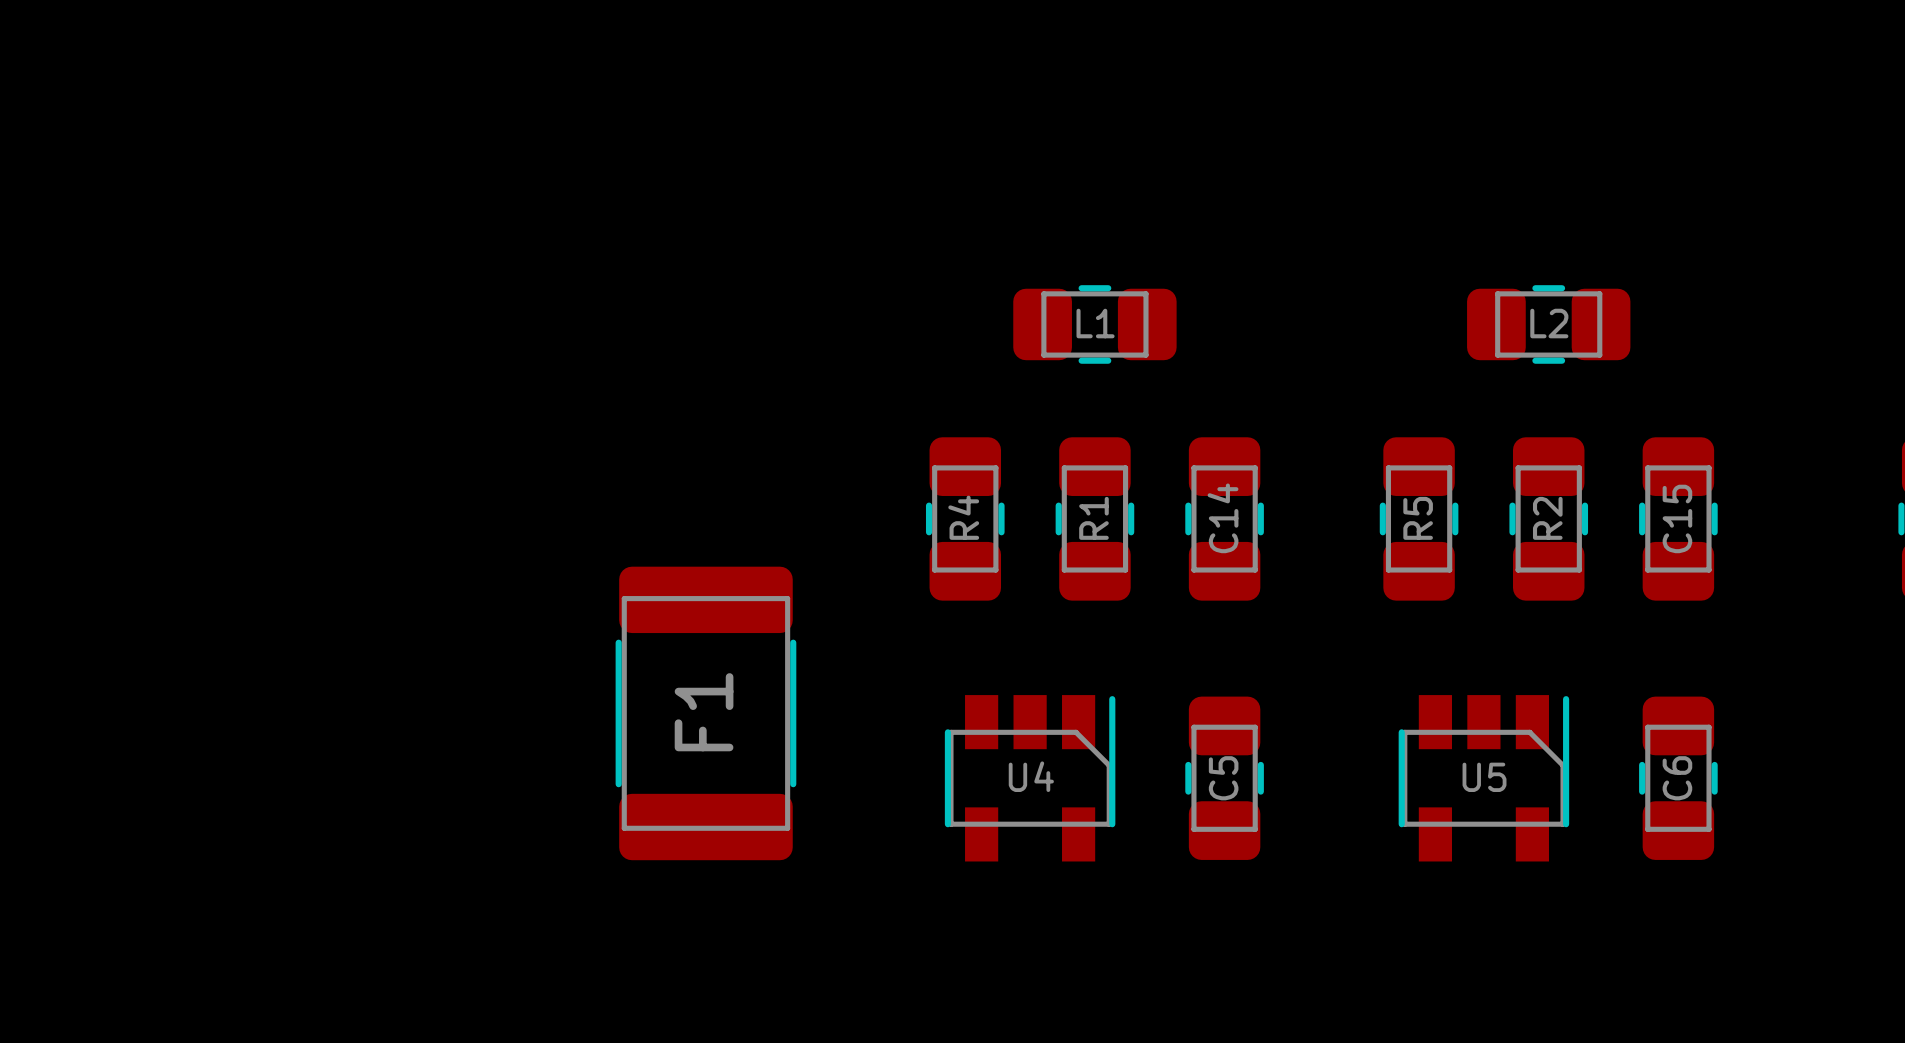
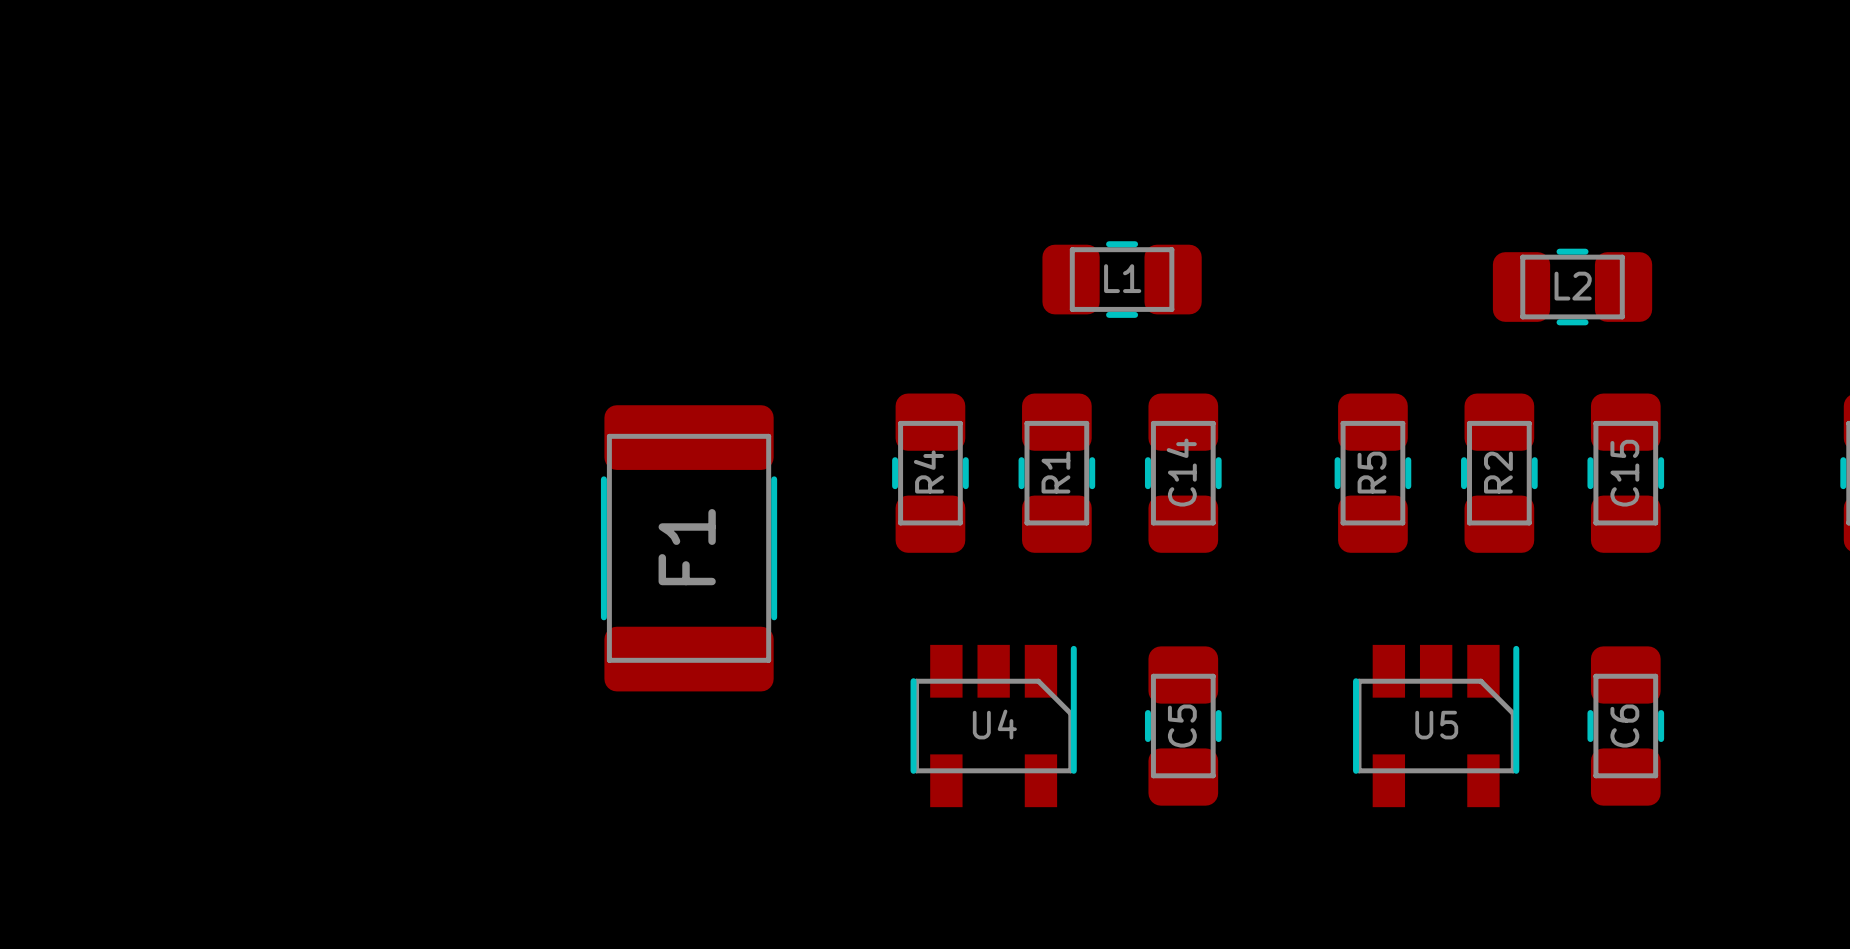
L1 position: (1094, 324) -> (1122, 279)
L2 position: (1548, 324) -> (1572, 287)
F1 position: (705, 713) -> (689, 548)

